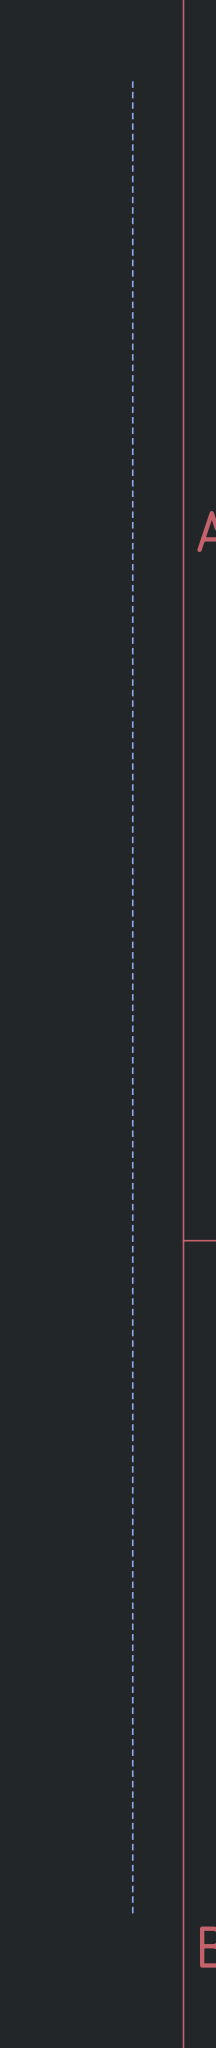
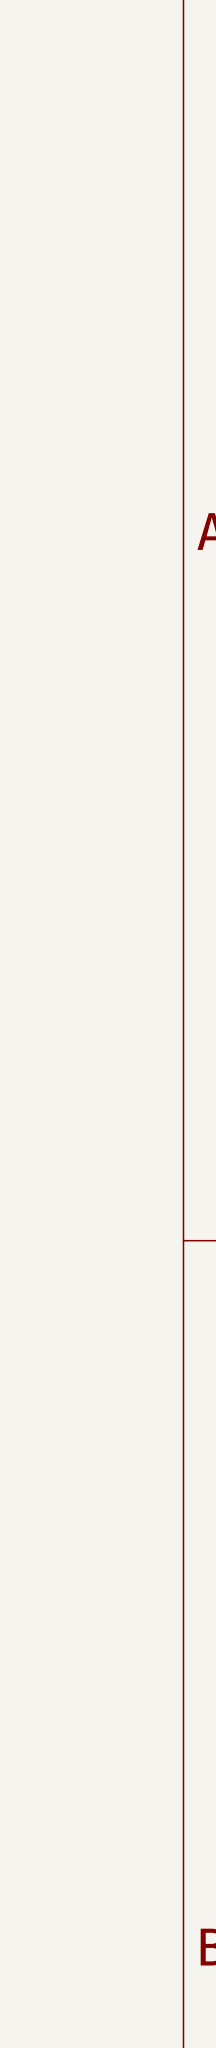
line: (132, 81) (132, 1915) -> none

